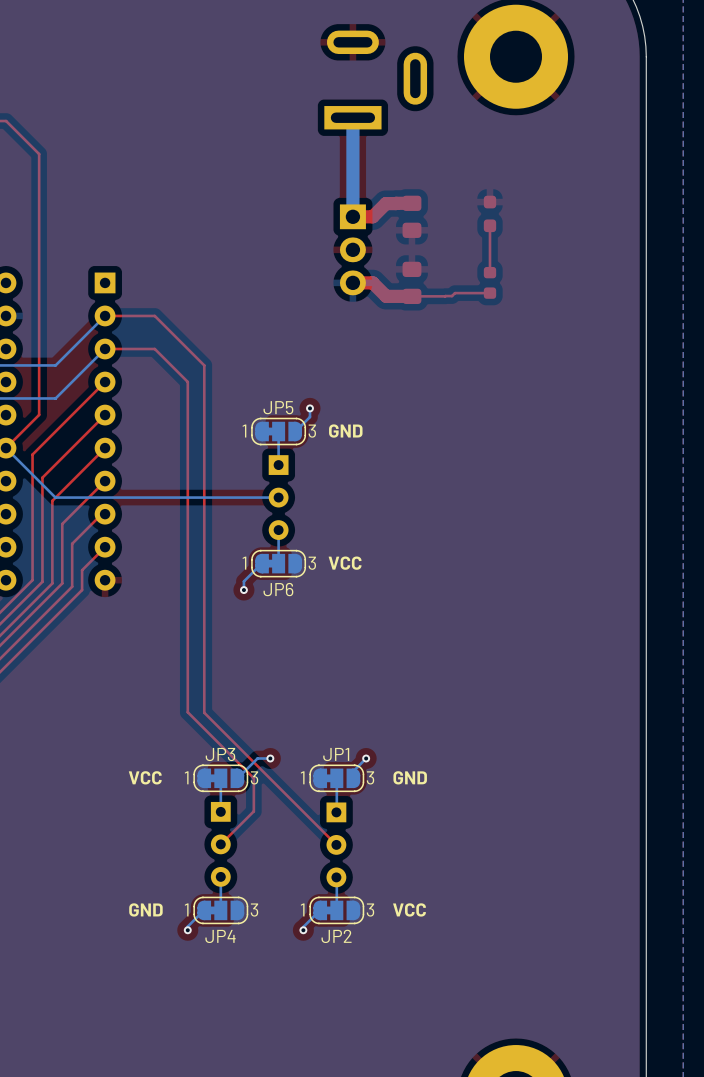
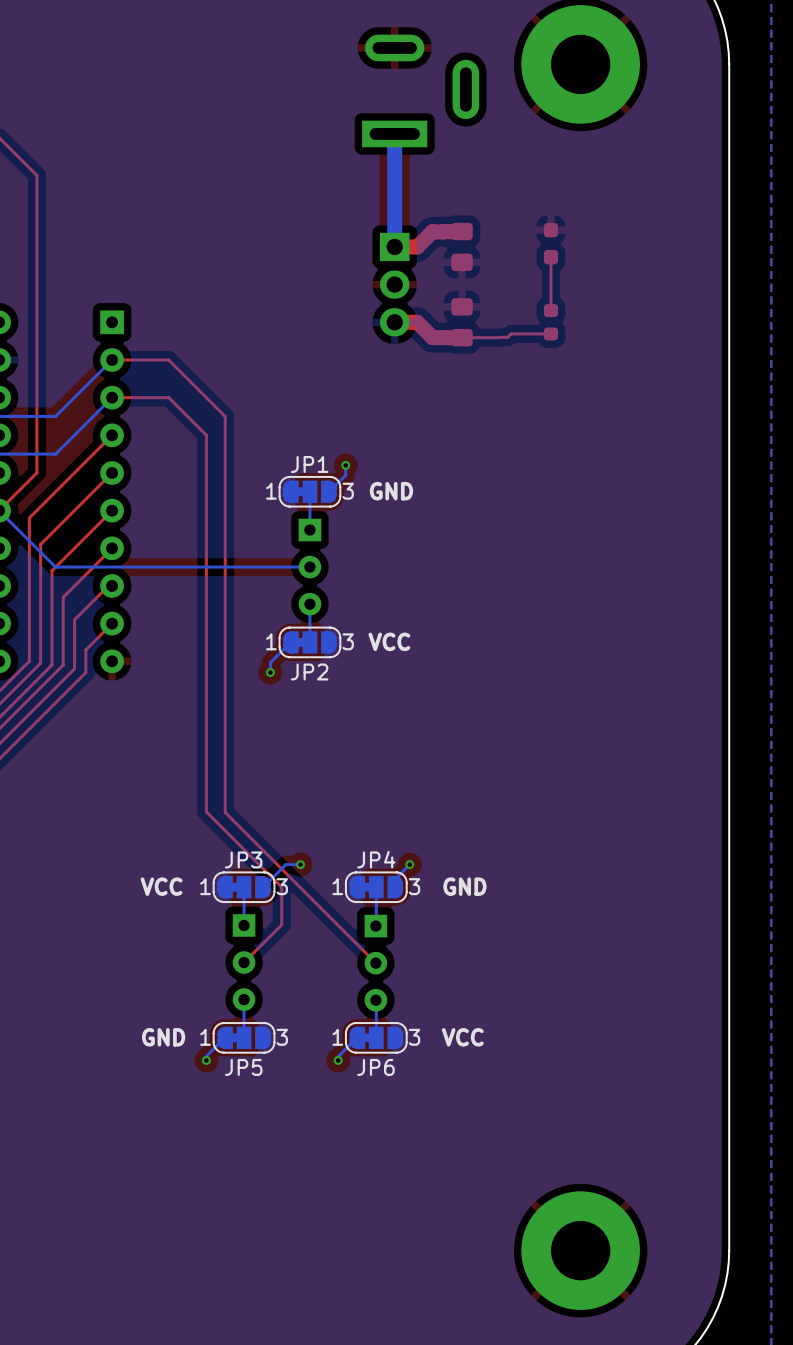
JP5 name: JP5 (278, 407) -> JP1 (309, 464)
JP6 name: JP6 (278, 589) -> JP2 (309, 671)
JP1 name: JP1 (336, 754) -> JP4 (376, 859)
JP4 name: JP4 (220, 936) -> JP5 (243, 1067)
JP2 name: JP2 (336, 936) -> JP6 (375, 1067)

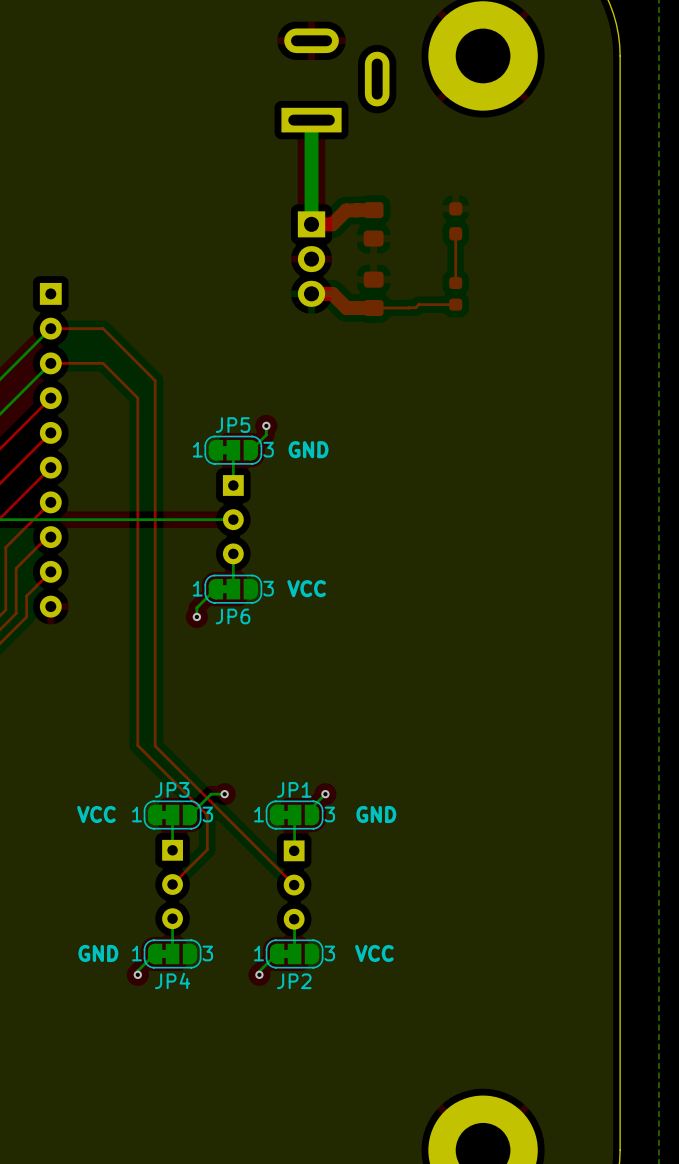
JP1 name: JP1 (309, 464) -> JP5 (233, 425)
JP2 name: JP2 (309, 671) -> JP6 (233, 616)
JP4 name: JP4 (376, 859) -> JP1 (294, 789)
JP5 name: JP5 (243, 1067) -> JP4 (172, 980)
JP6 name: JP6 (375, 1067) -> JP2 (294, 981)

